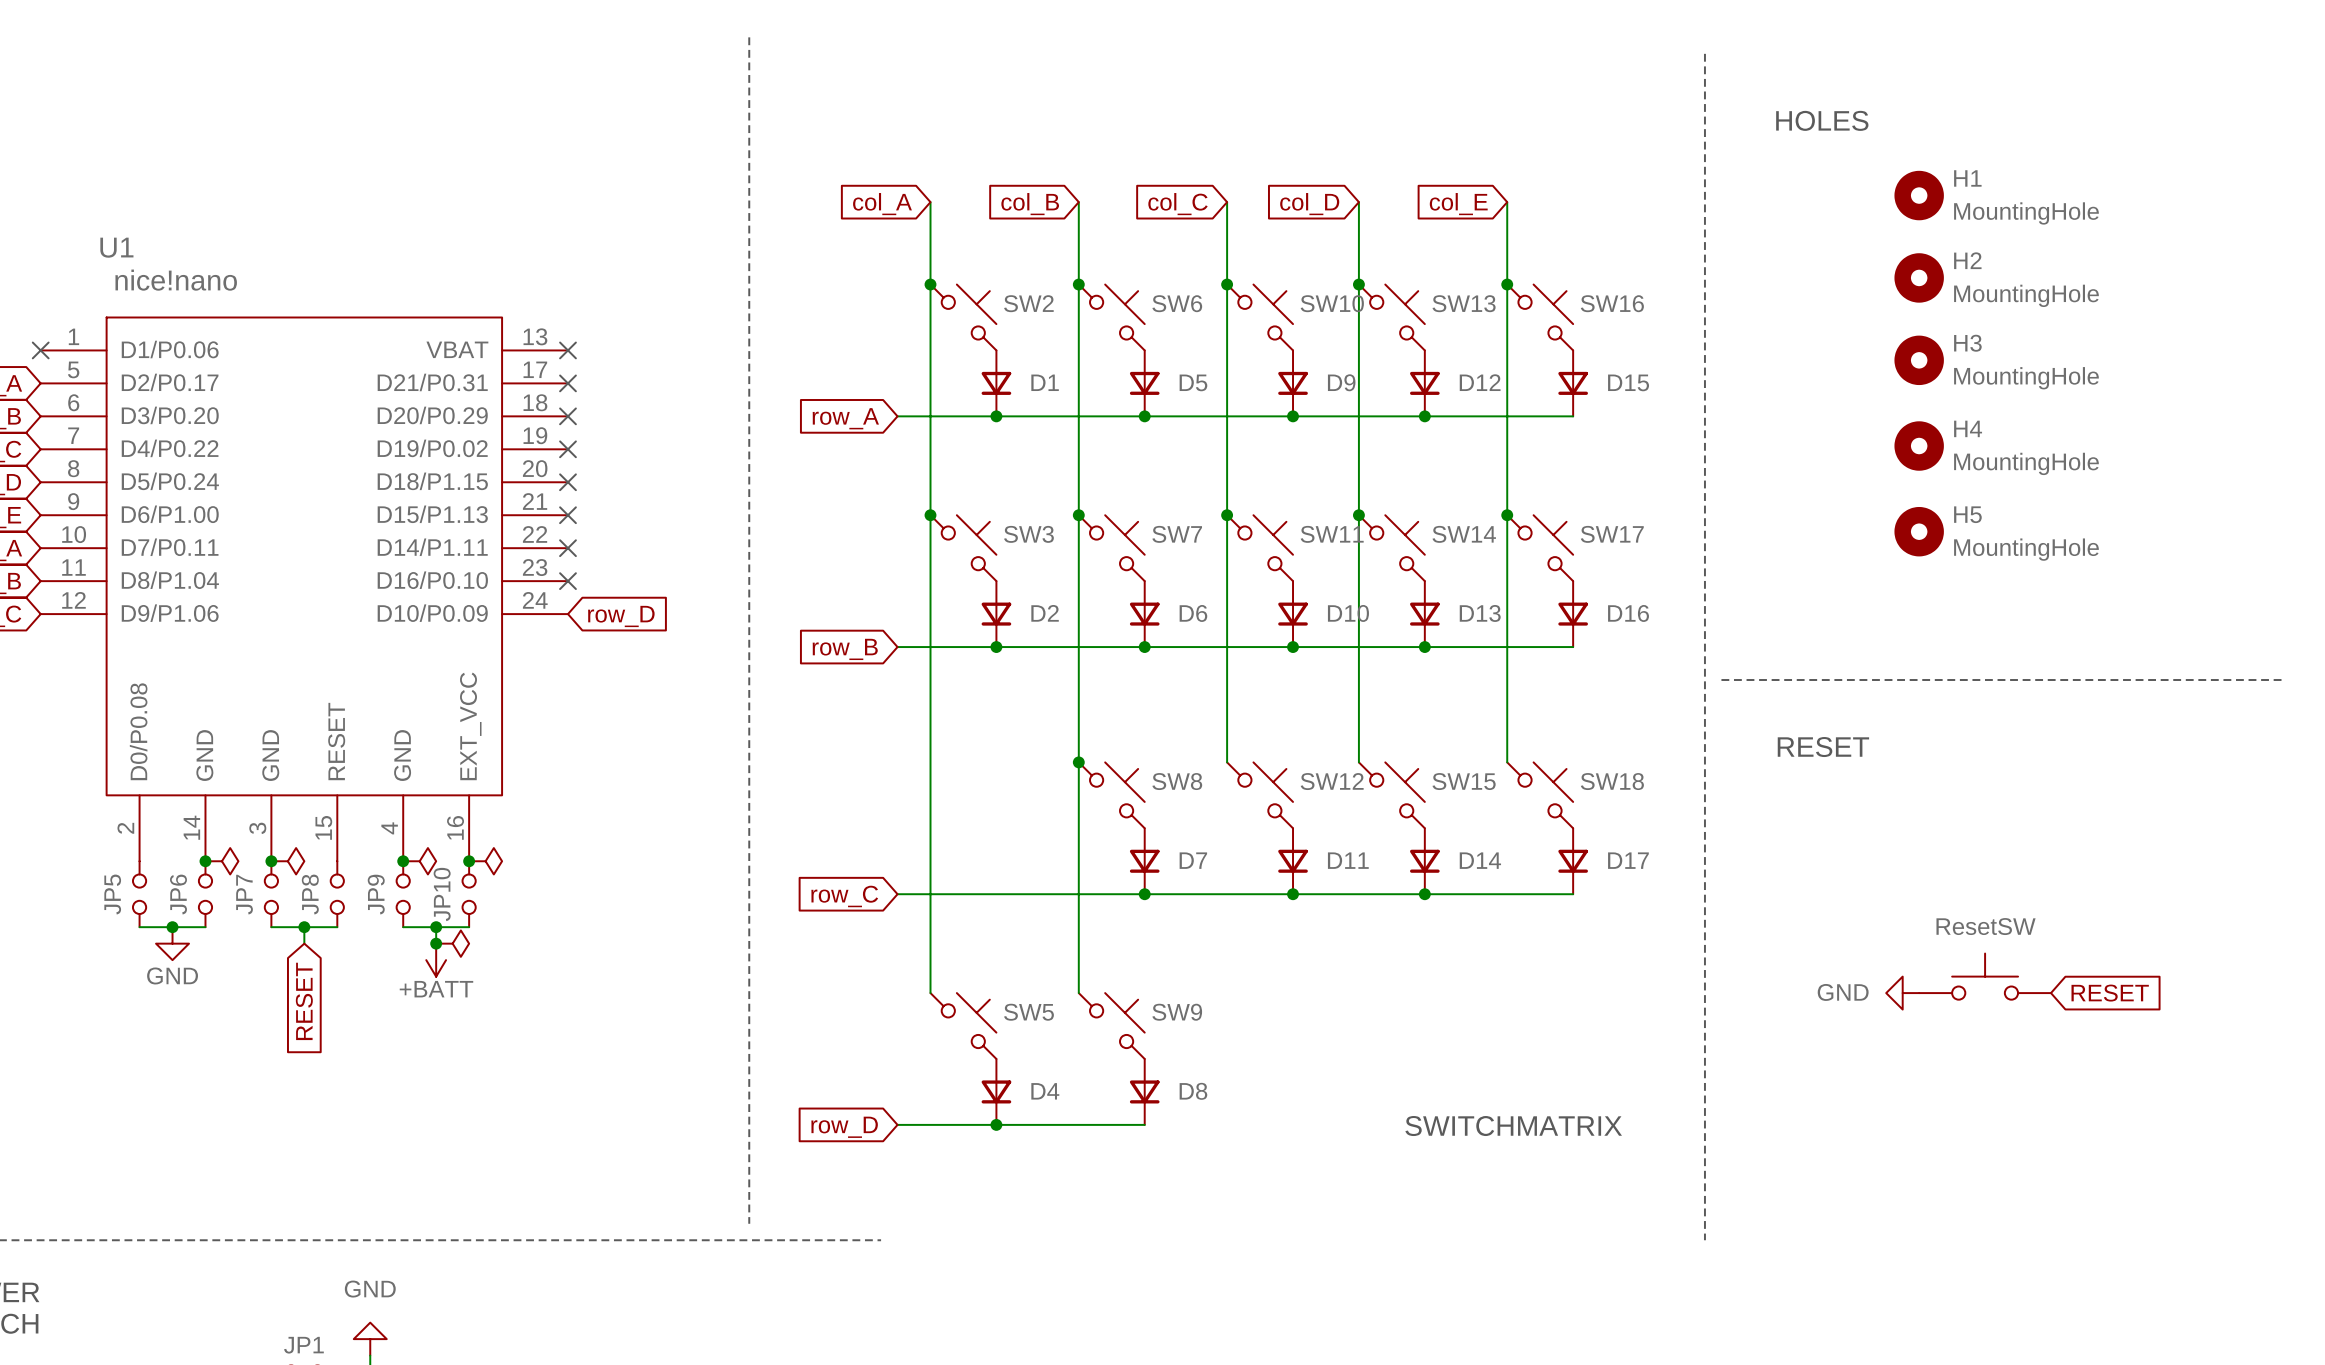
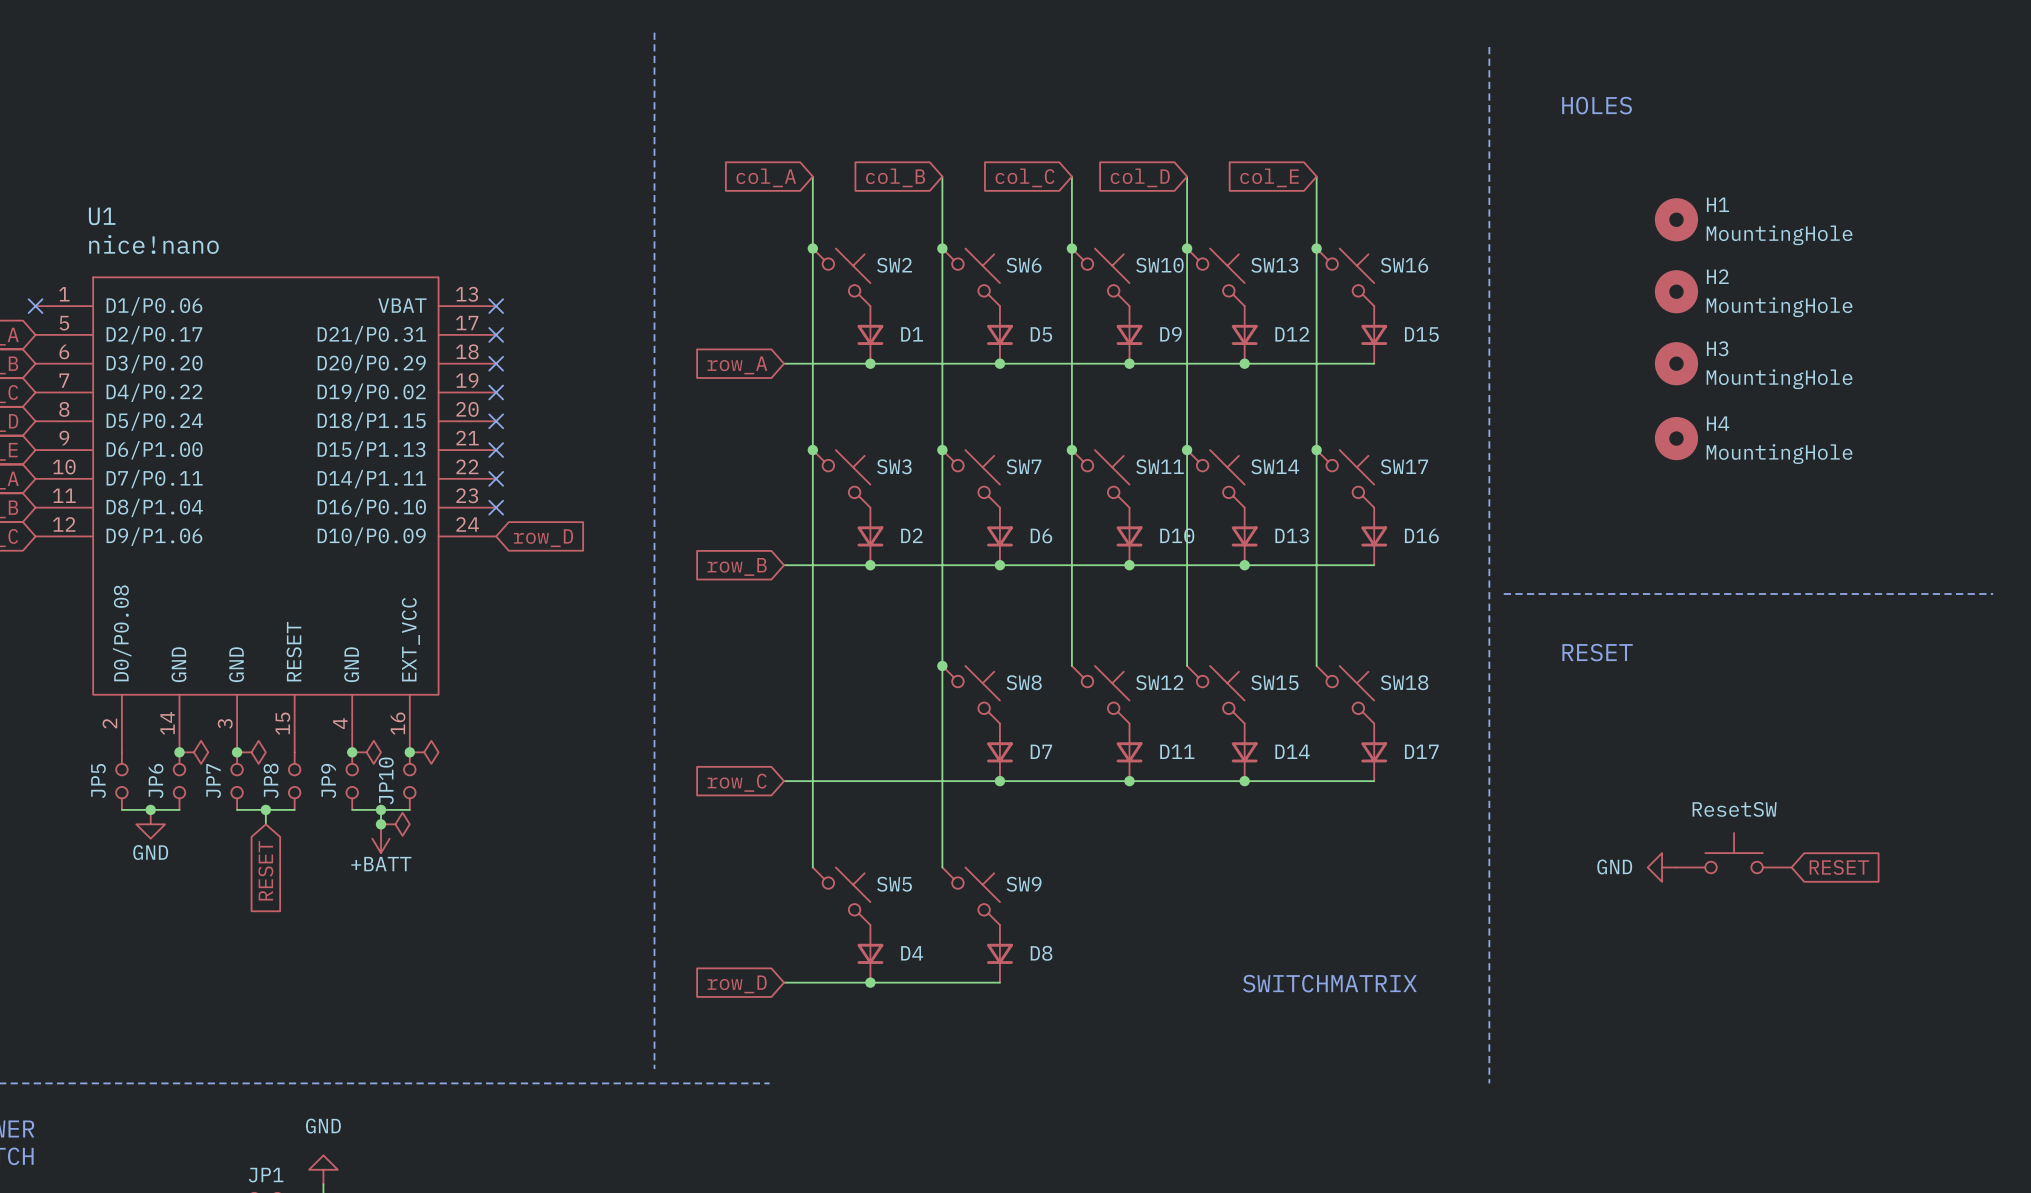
H1 position: (1919, 195) -> (1676, 219)
H2 position: (1919, 277) -> (1676, 291)
H3 position: (1919, 360) -> (1676, 363)
H4 position: (1919, 446) -> (1676, 438)
H5: MountingHole (1919, 531) -> none

